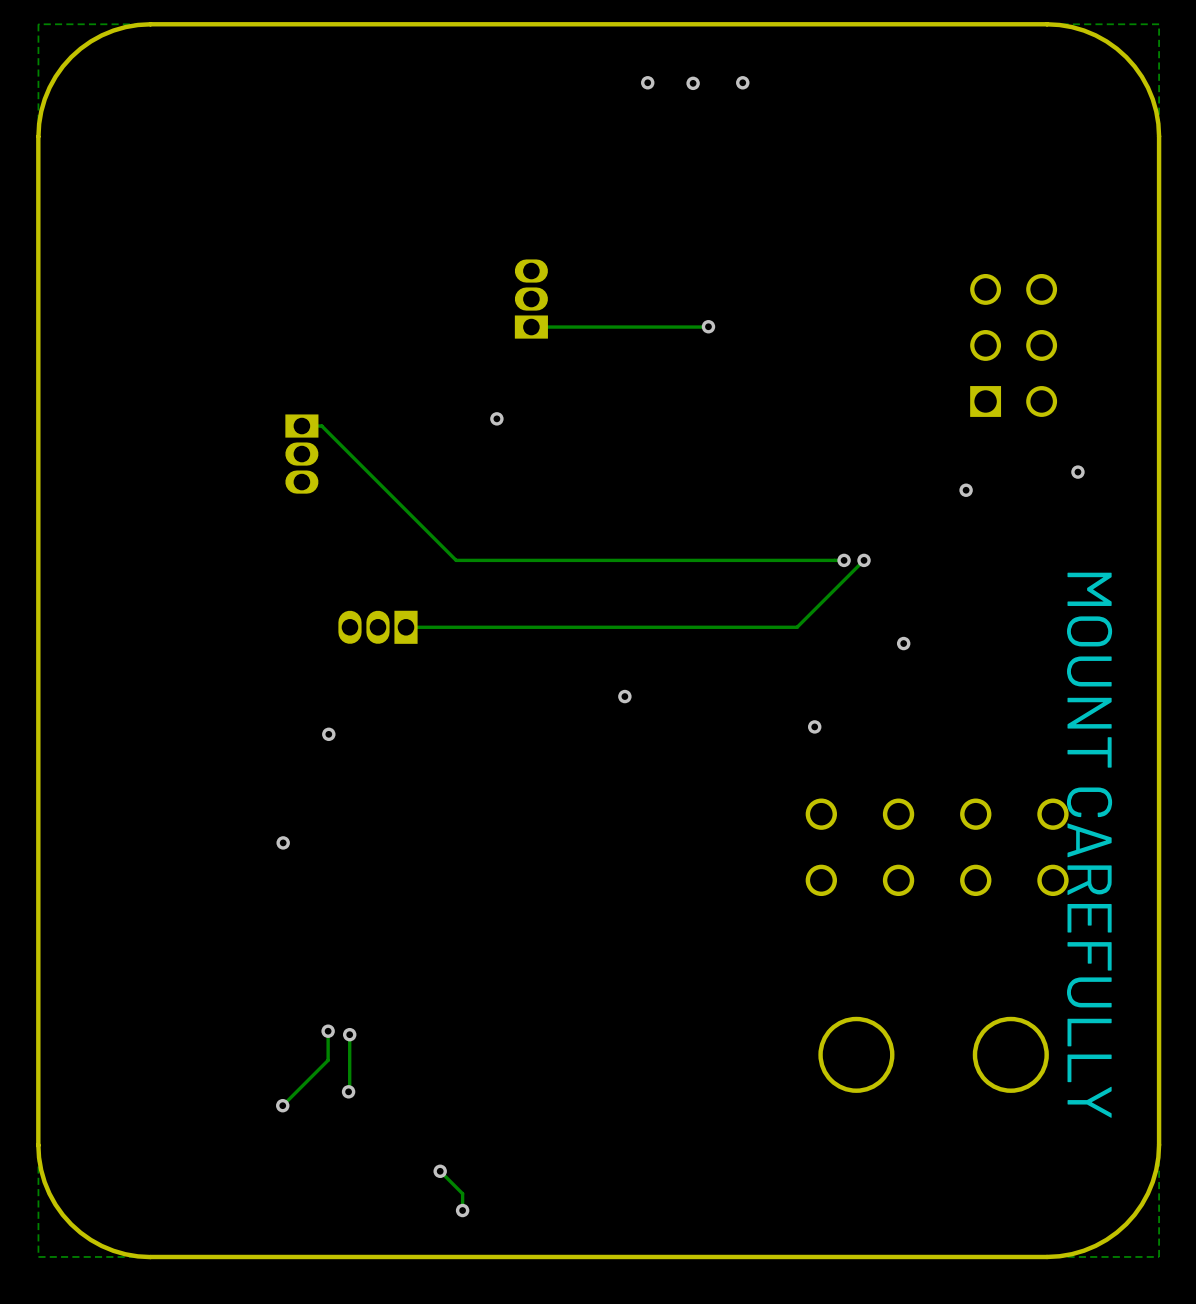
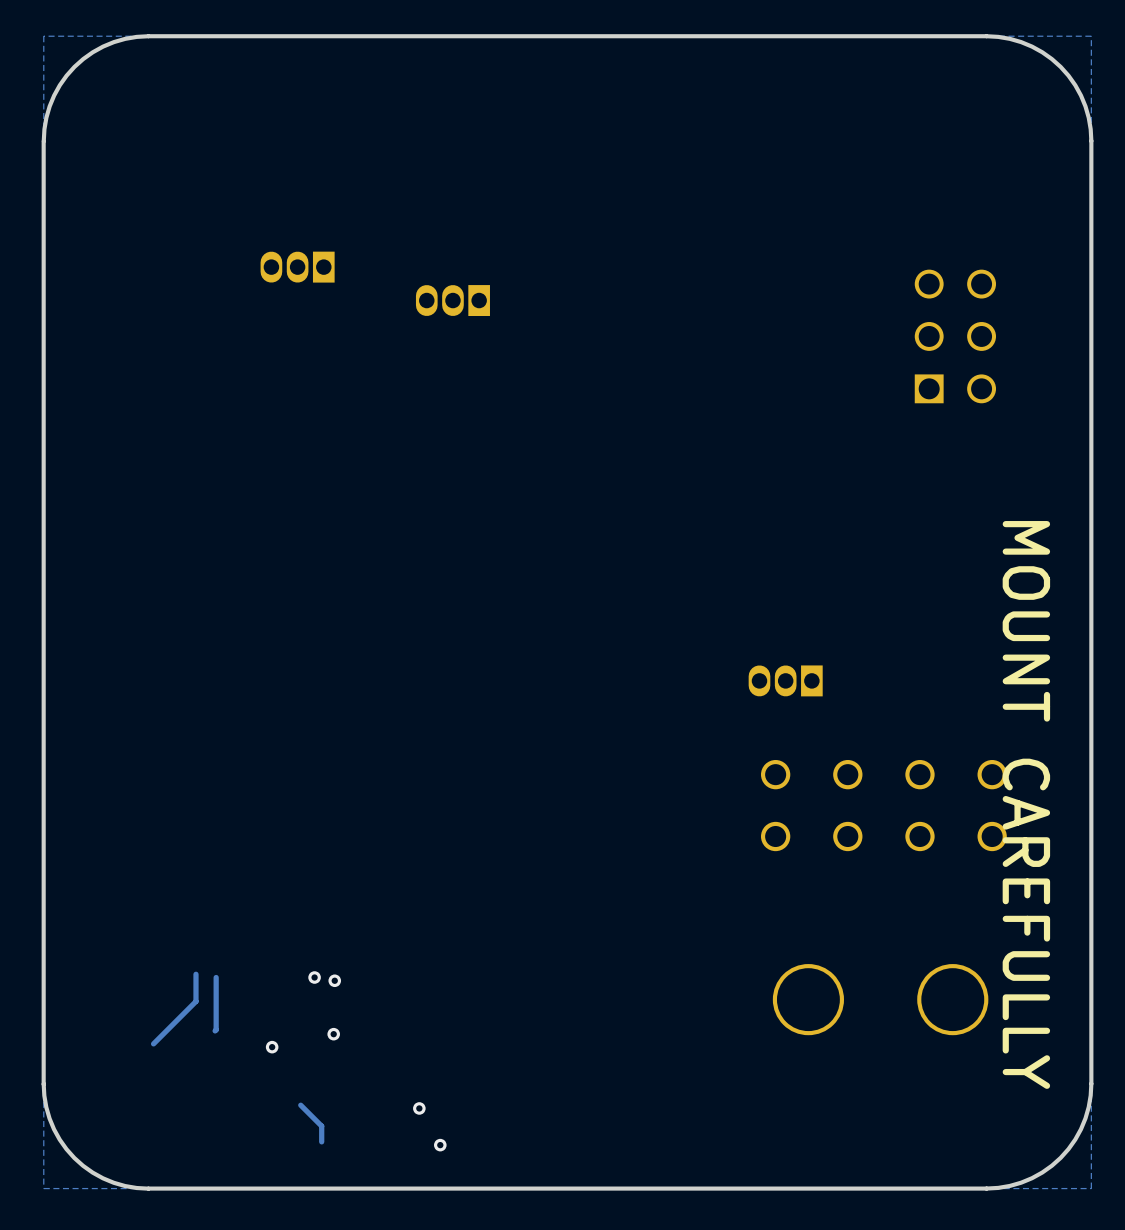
via: (647, 82) -> none
via: (742, 82) -> none
via: (693, 83) -> none
part: none -> (297, 267)
part rotation: 0° (531, 299) -> 90° counterclockwise (452, 300)
part position: (531, 299) -> (452, 300)
via: (708, 326) -> none
track: (708, 327) (531, 327) -> none
via: (496, 418) -> none
track: (301, 426) (321, 426) (456, 560) (844, 560) -> none
part: (301, 454) -> none
via: (1077, 472) -> none
via: (966, 490) -> none
via: (844, 560) -> none
track: (864, 560) (797, 627) (406, 627) -> none
via: (864, 560) -> none
part: (377, 627) -> none
via: (903, 643) -> none
via: (624, 696) -> none
part: none -> (785, 680)
via: (814, 726) -> none
via: (328, 734) -> none
via: (283, 842) -> none
track: (328, 1031) (328, 1060) (282, 1105) -> (195, 974) (195, 1001) (153, 1043)
track: (349, 1034) (348, 1091) -> (216, 977) (215, 1030)
track: (440, 1171) (462, 1193) (462, 1210) -> (300, 1105) (321, 1126) (321, 1141)

